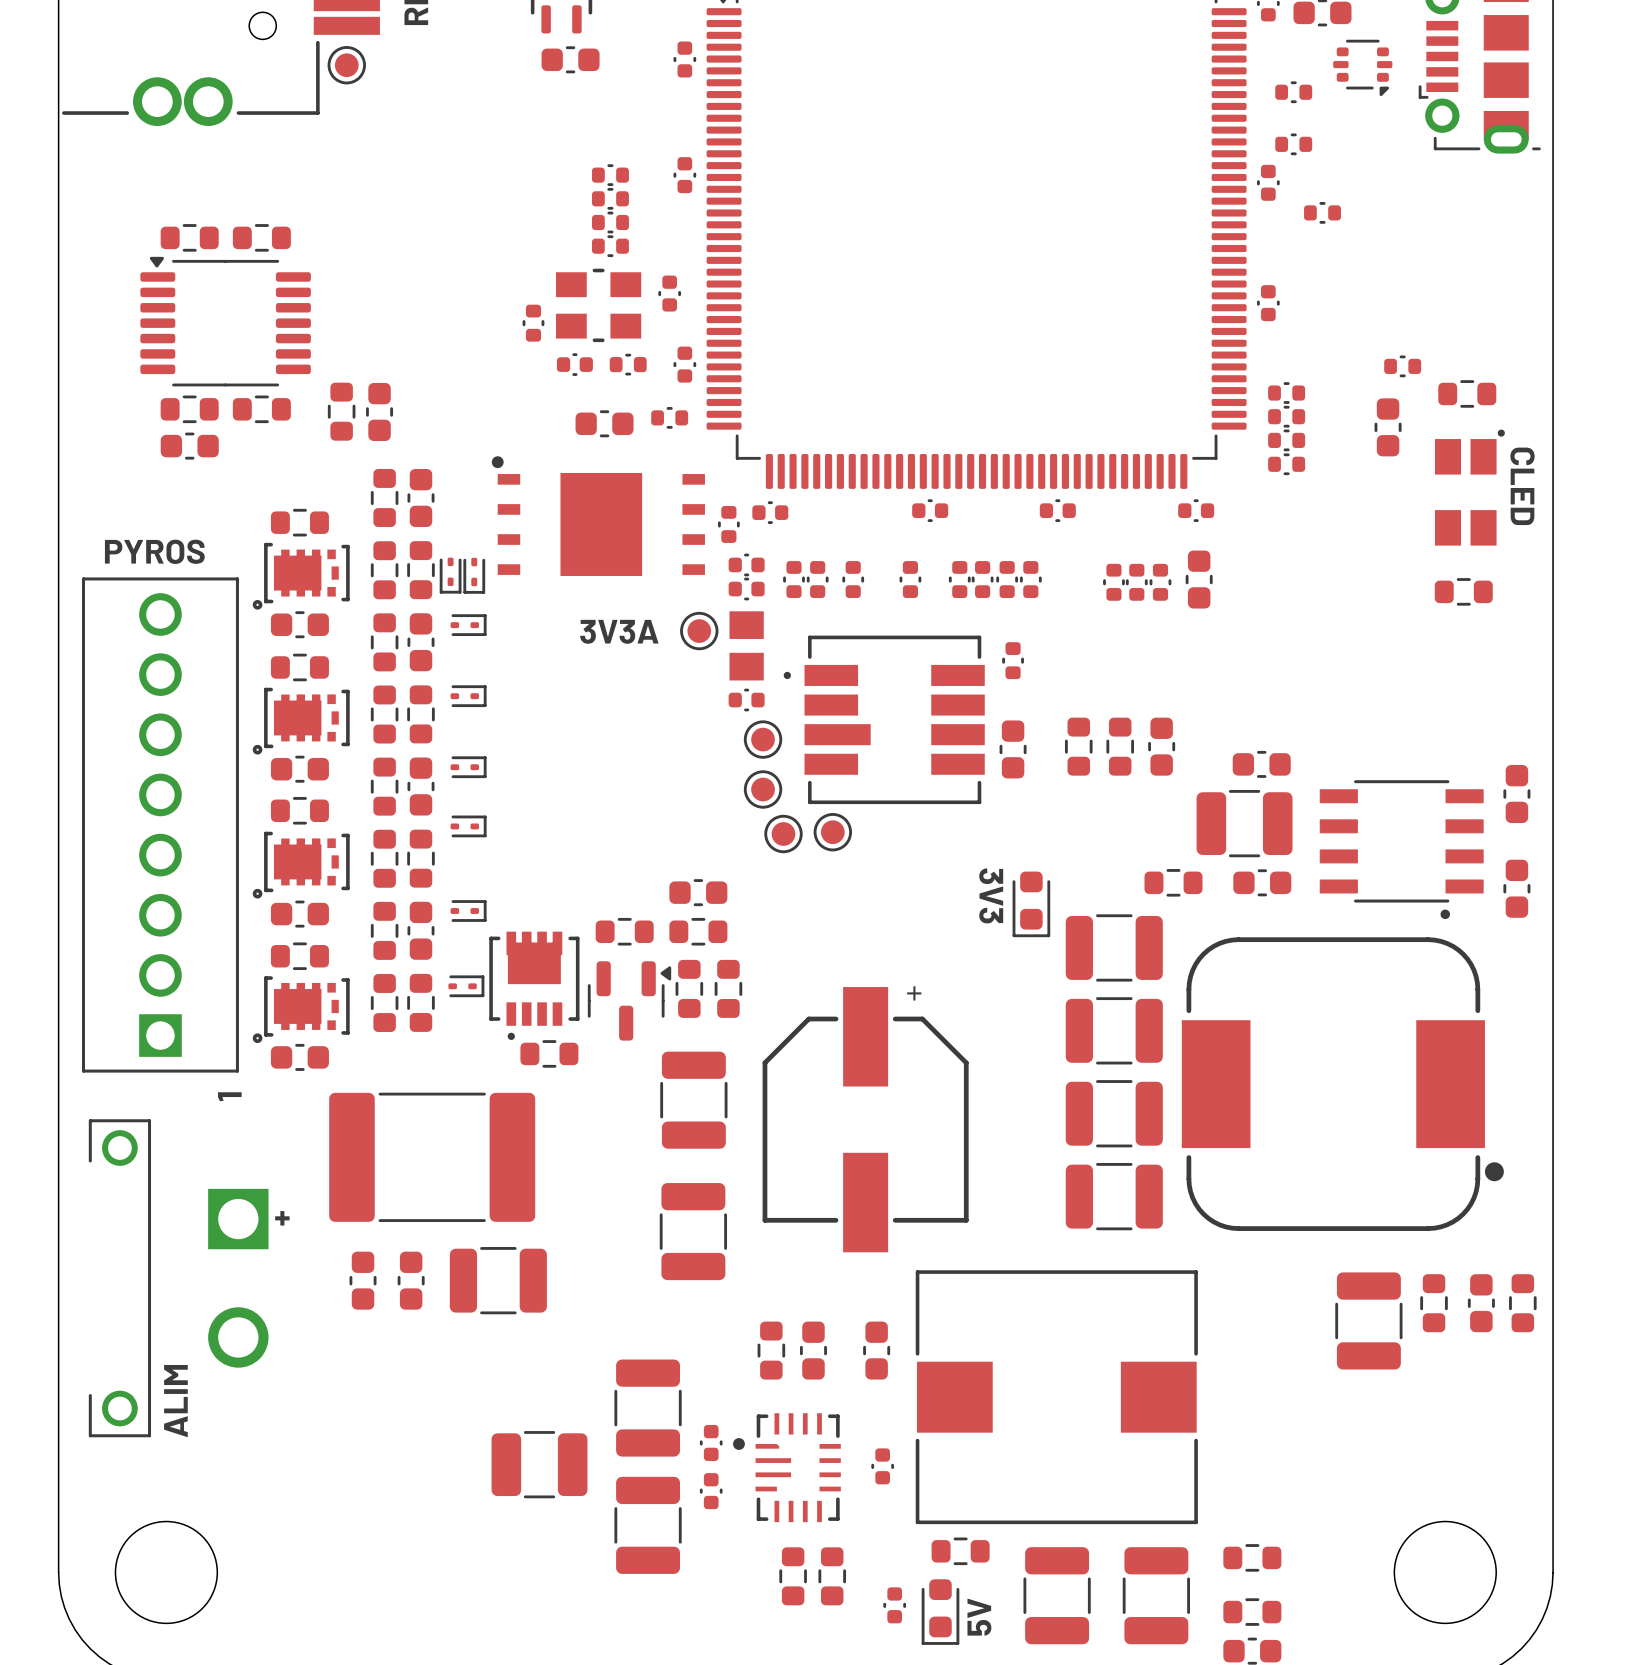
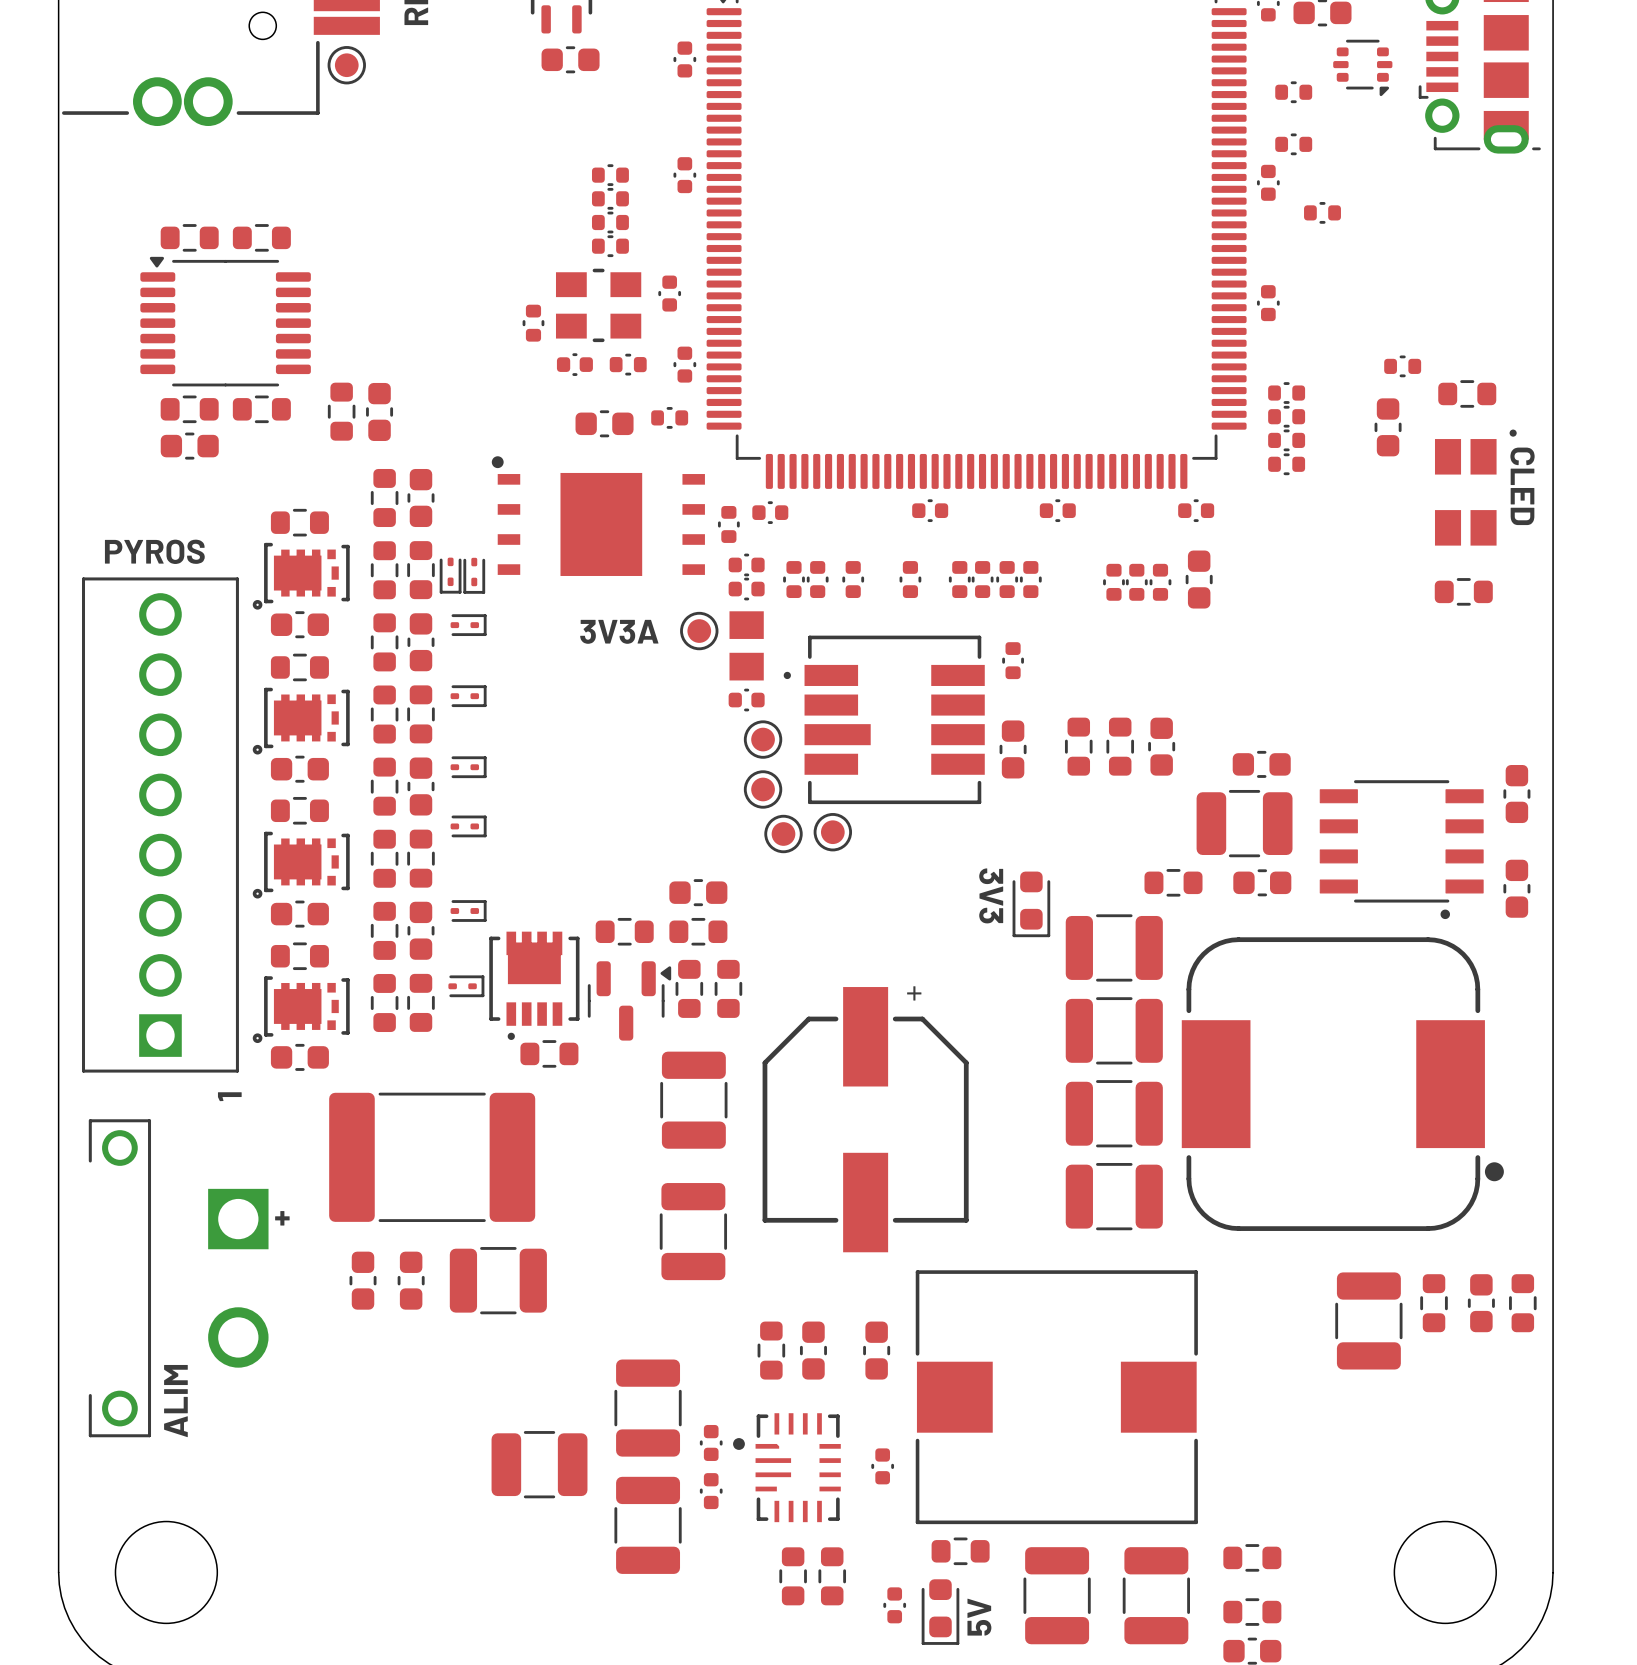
part footprint: [1434, 429, 1505, 546] -> [1434, 429, 1517, 546]

